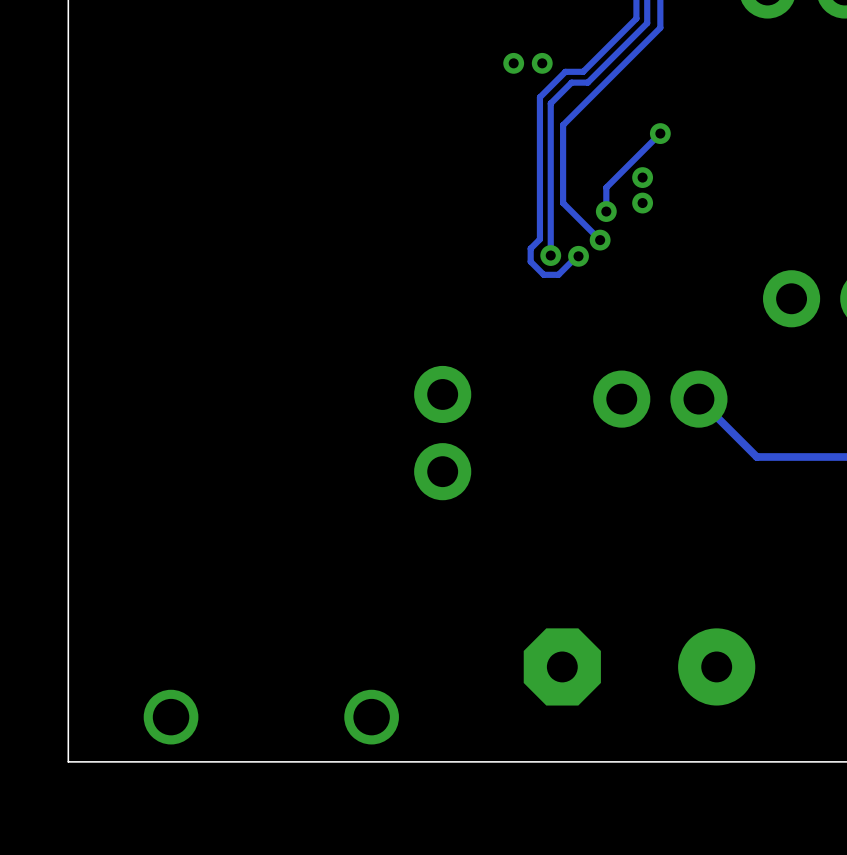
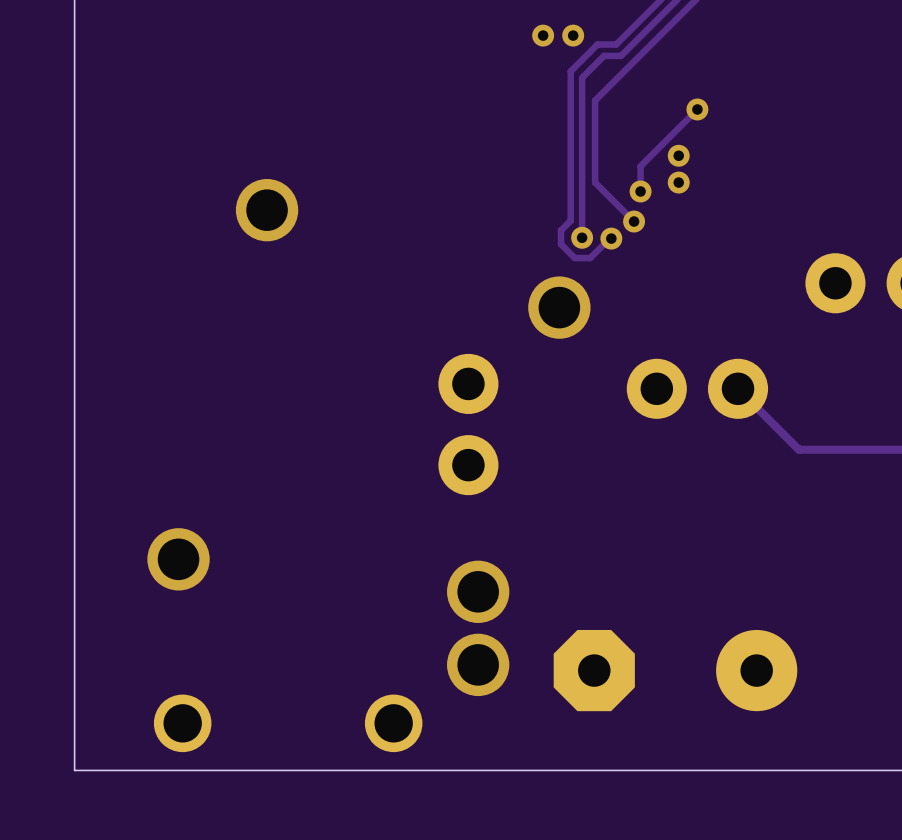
via: none -> (267, 210)
via: none -> (559, 307)
via: none -> (178, 559)
via: none -> (478, 591)
via: none -> (478, 664)

